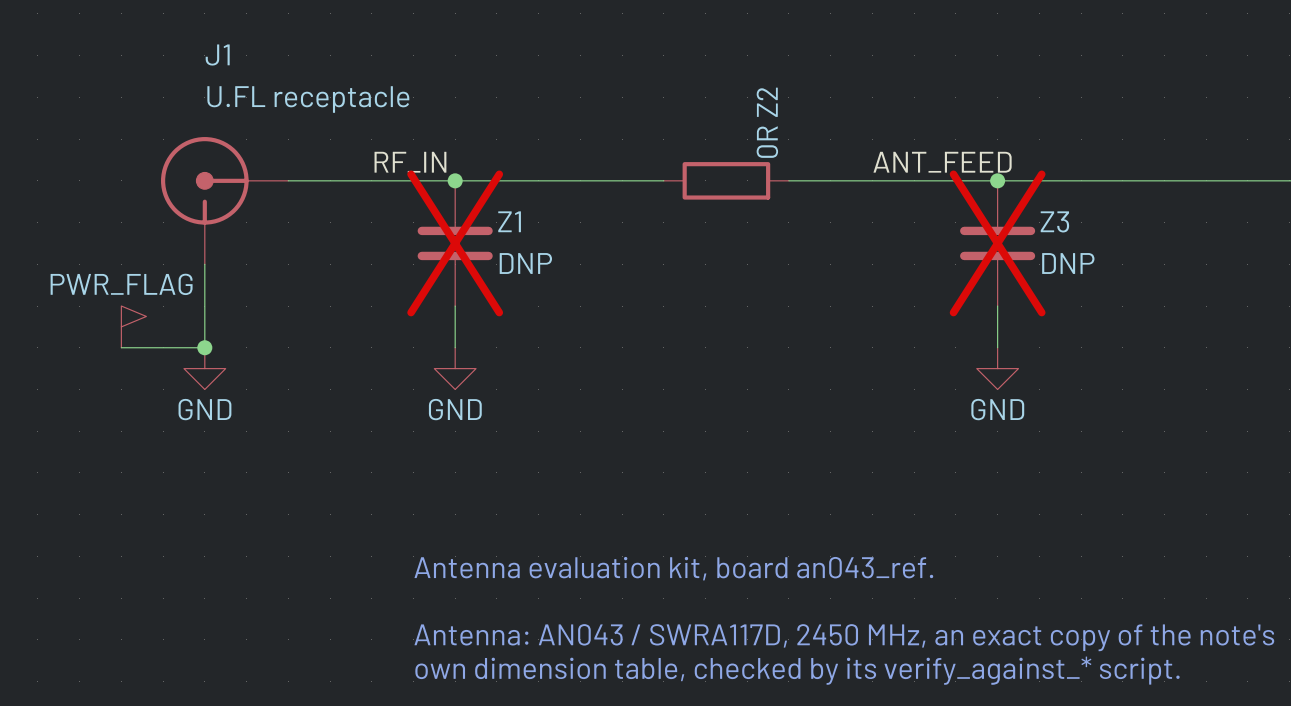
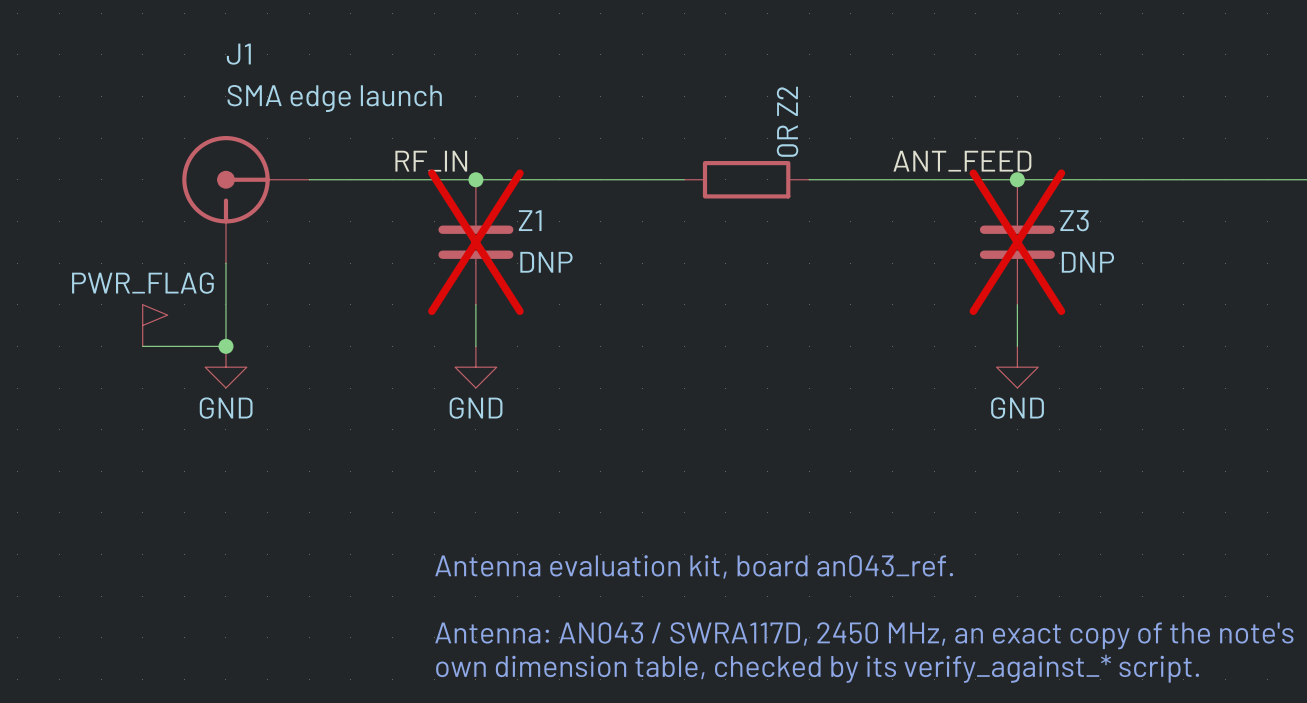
J1 value: U.FL receptacle (308, 99) -> SMA edge launch (334, 98)

